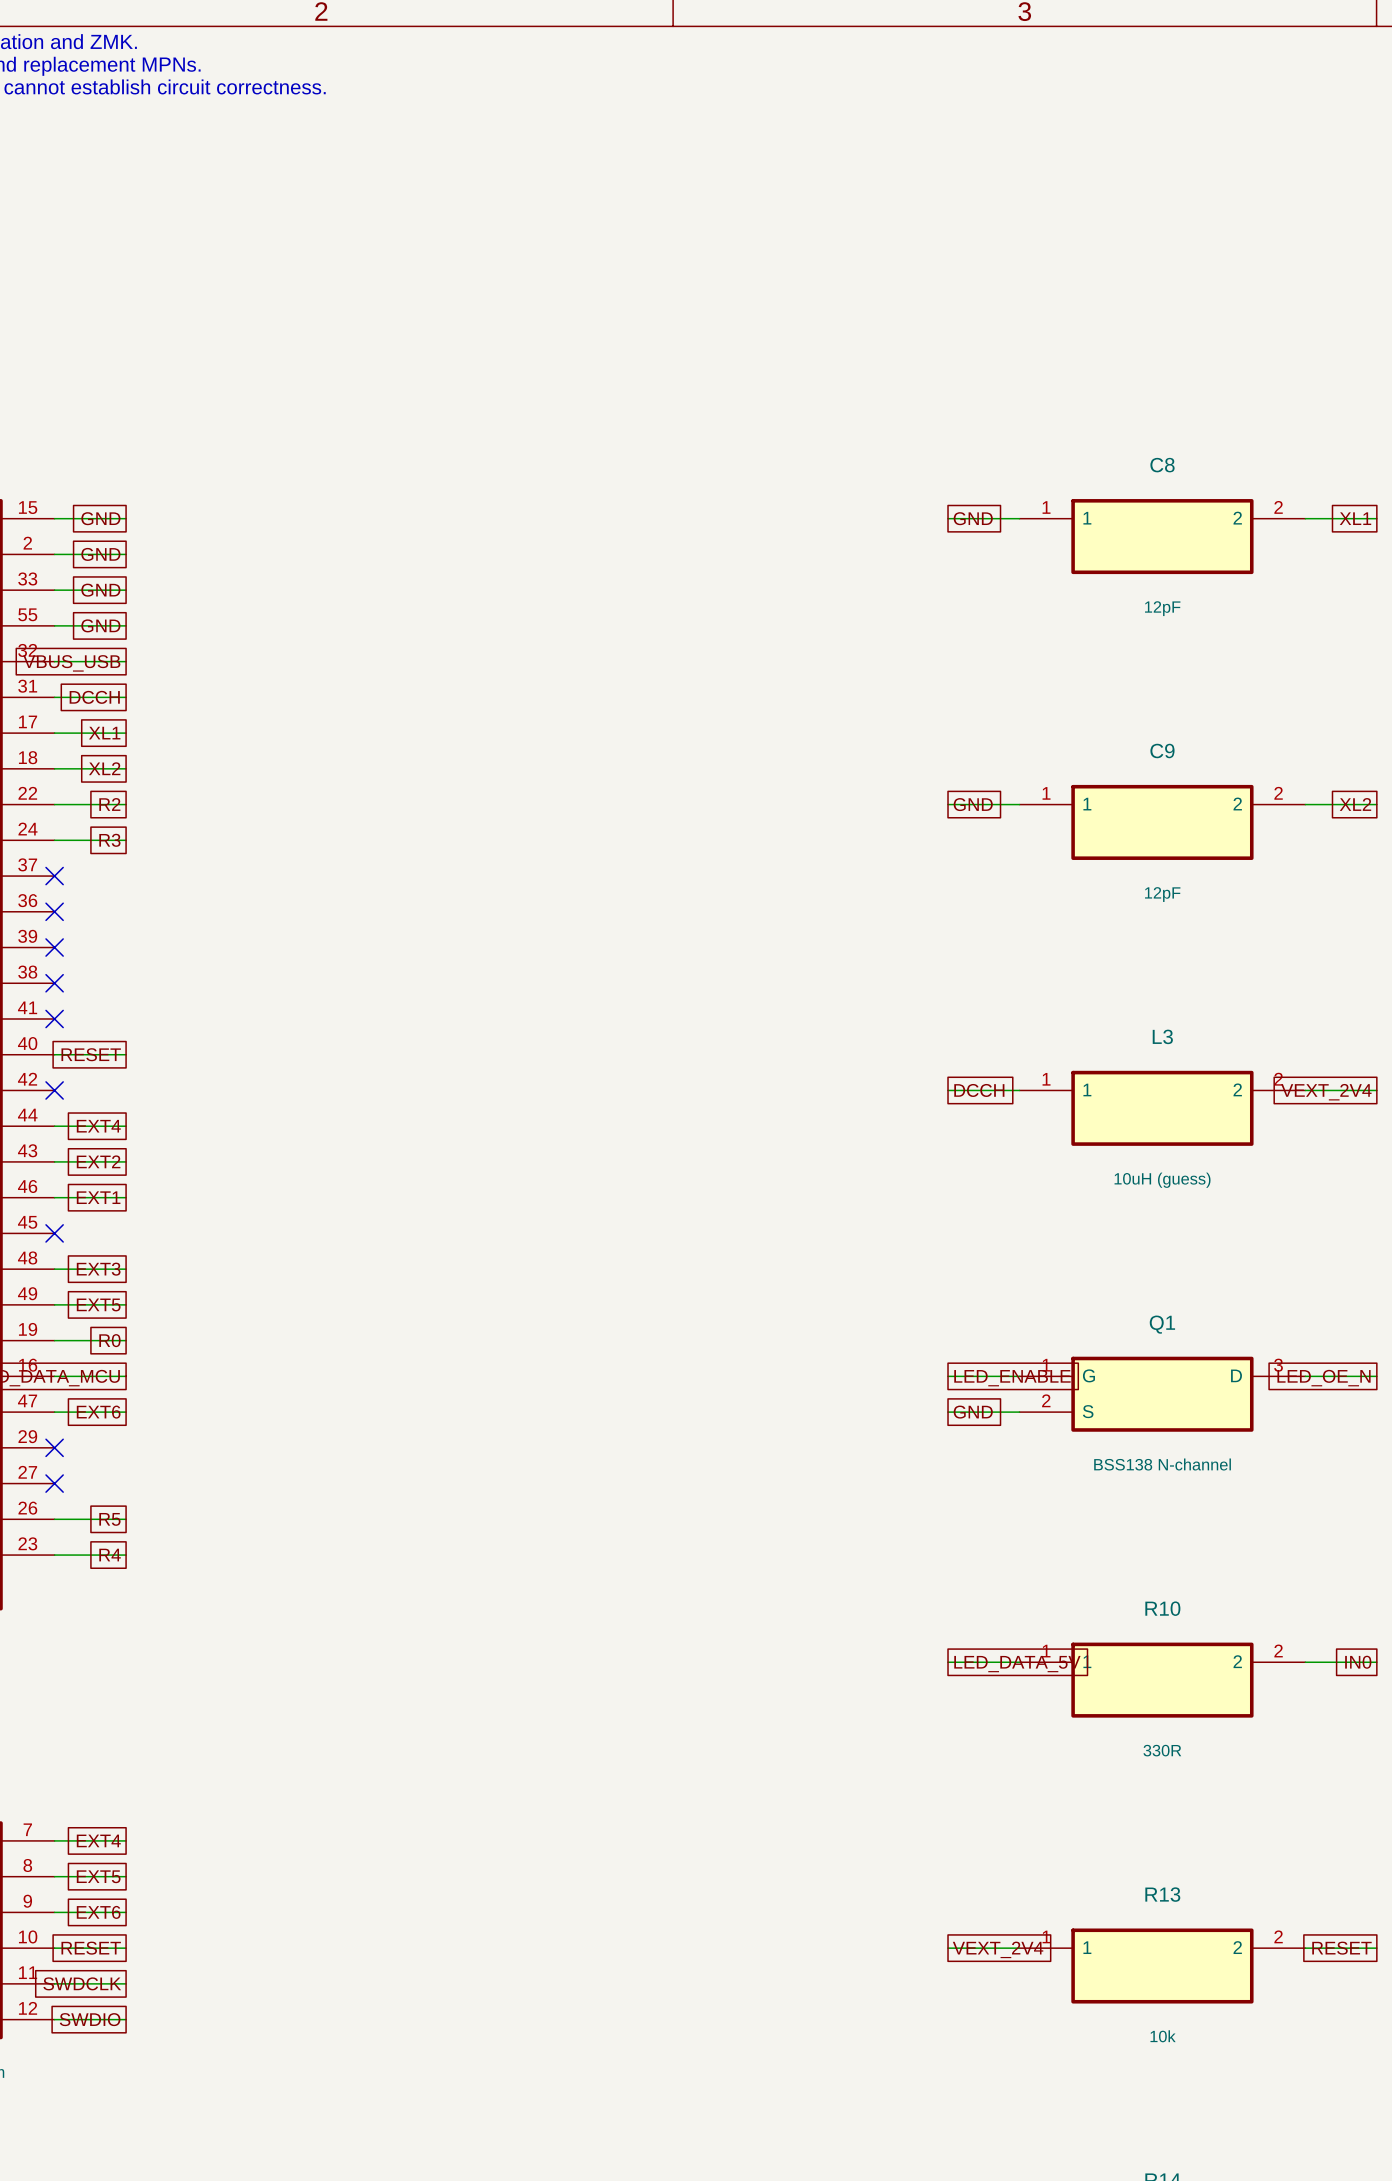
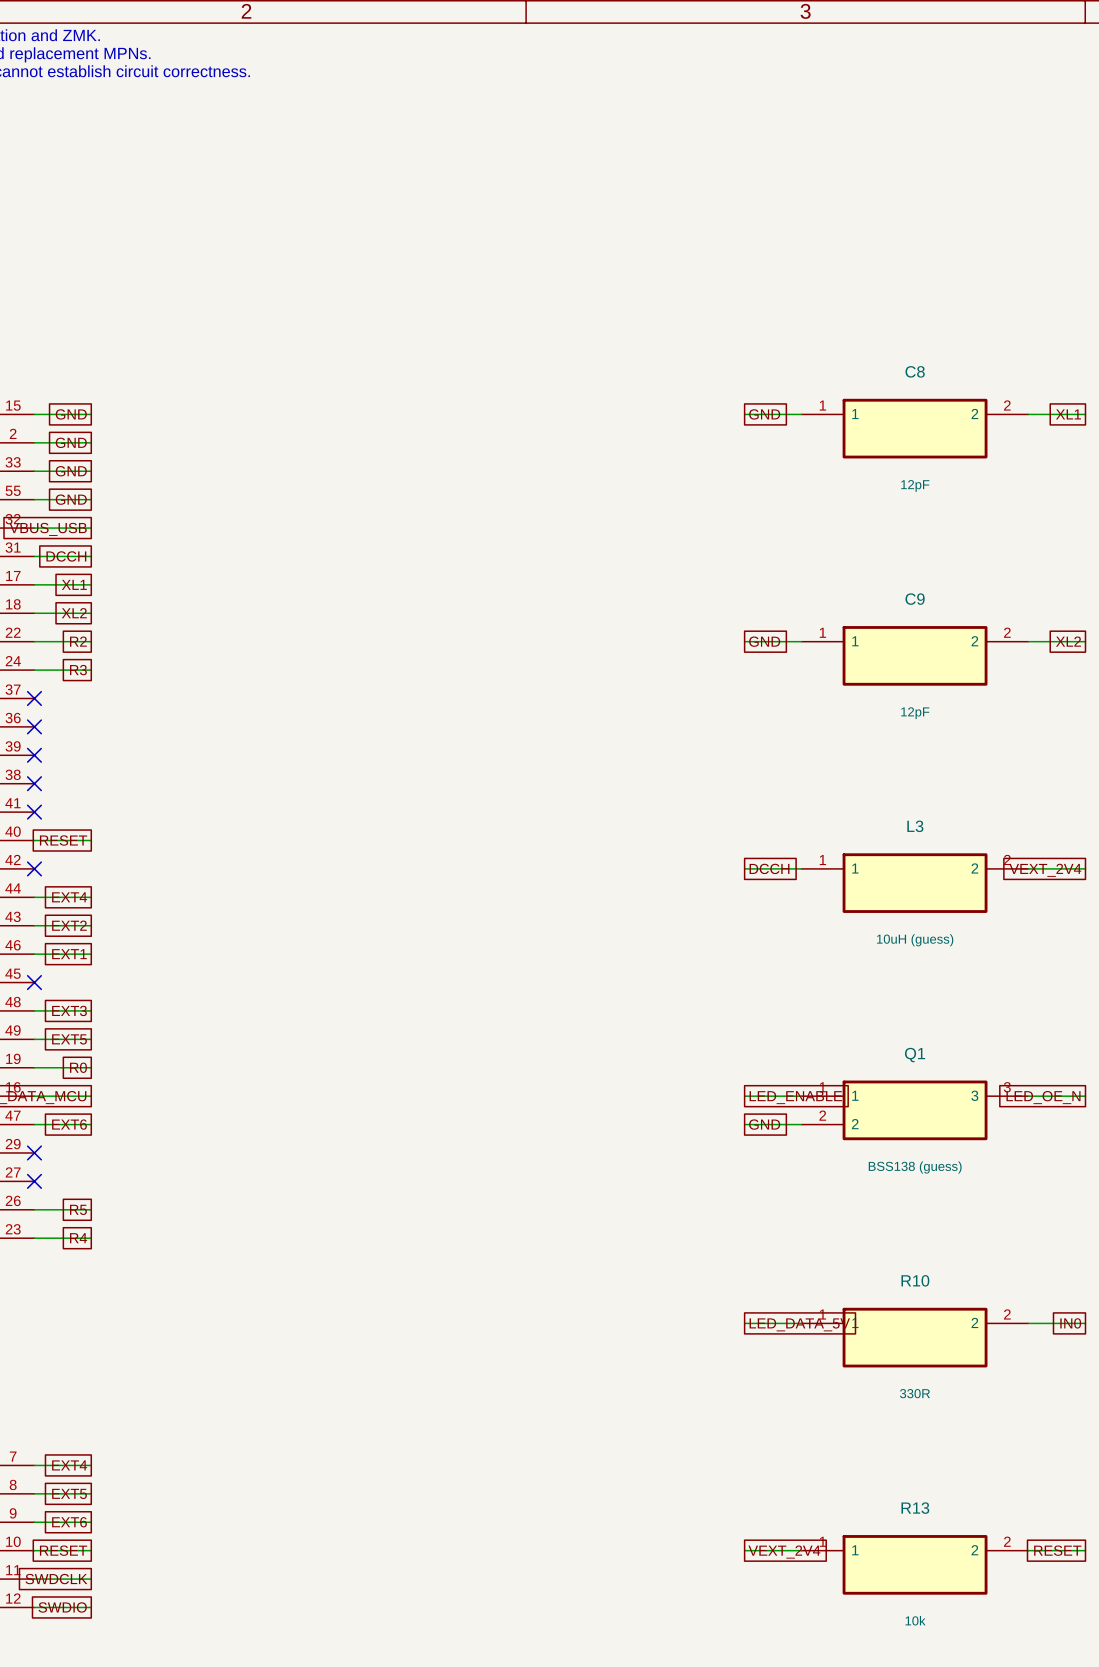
Q1 pin name: G (1088, 1375) -> 1 (855, 1095)
Q1 pin name: D (1236, 1375) -> 3 (974, 1095)
Q1 pin name: S (1088, 1411) -> 2 (855, 1124)
Q1 value: BSS138 N-channel (1162, 1464) -> BSS138 (guess) (915, 1167)

